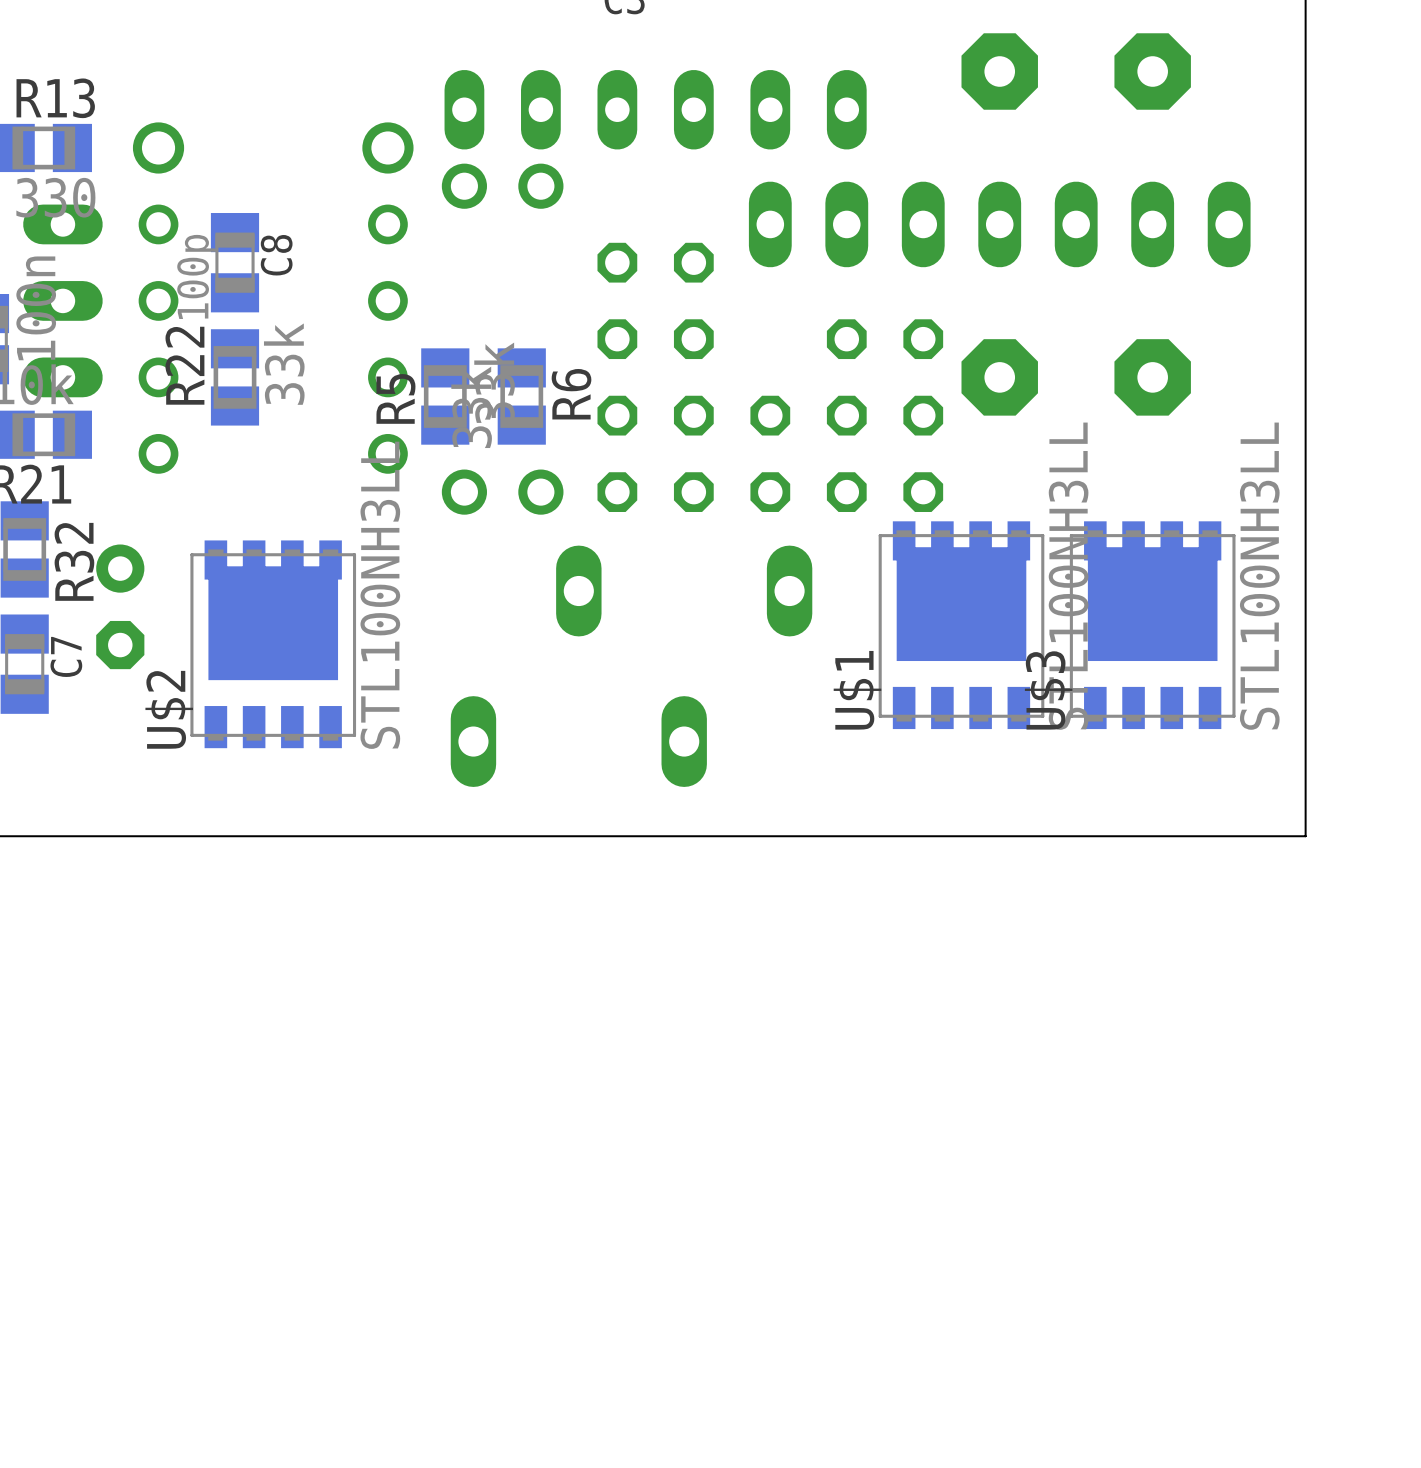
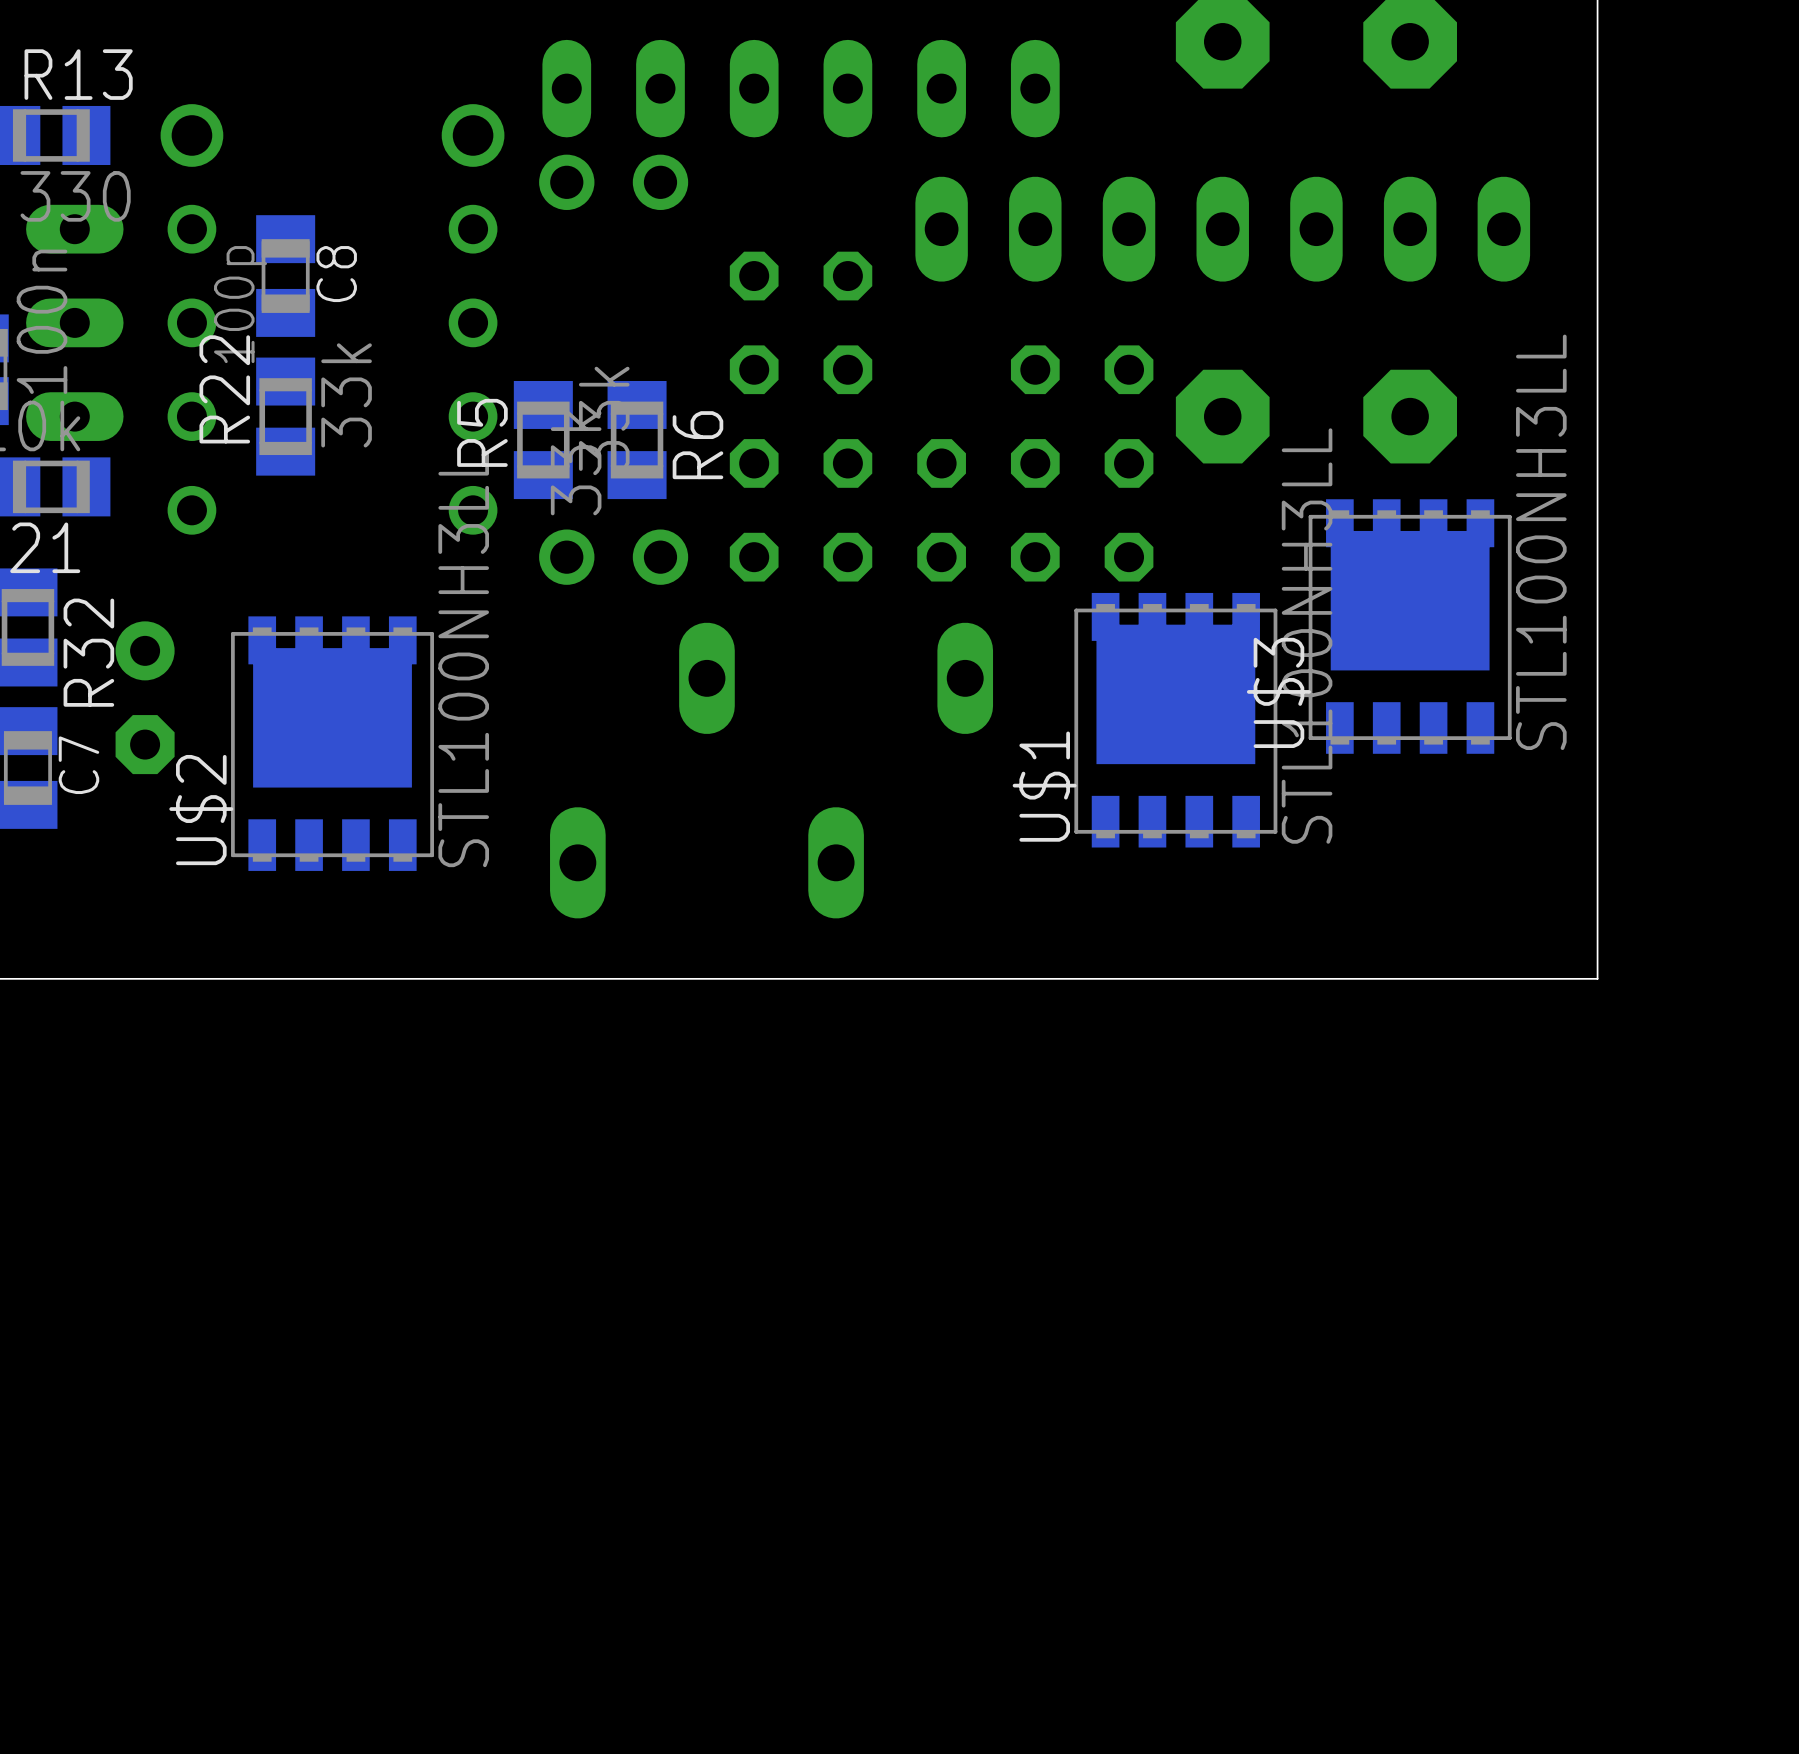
U$3 position: (1152, 625) -> (1410, 626)

